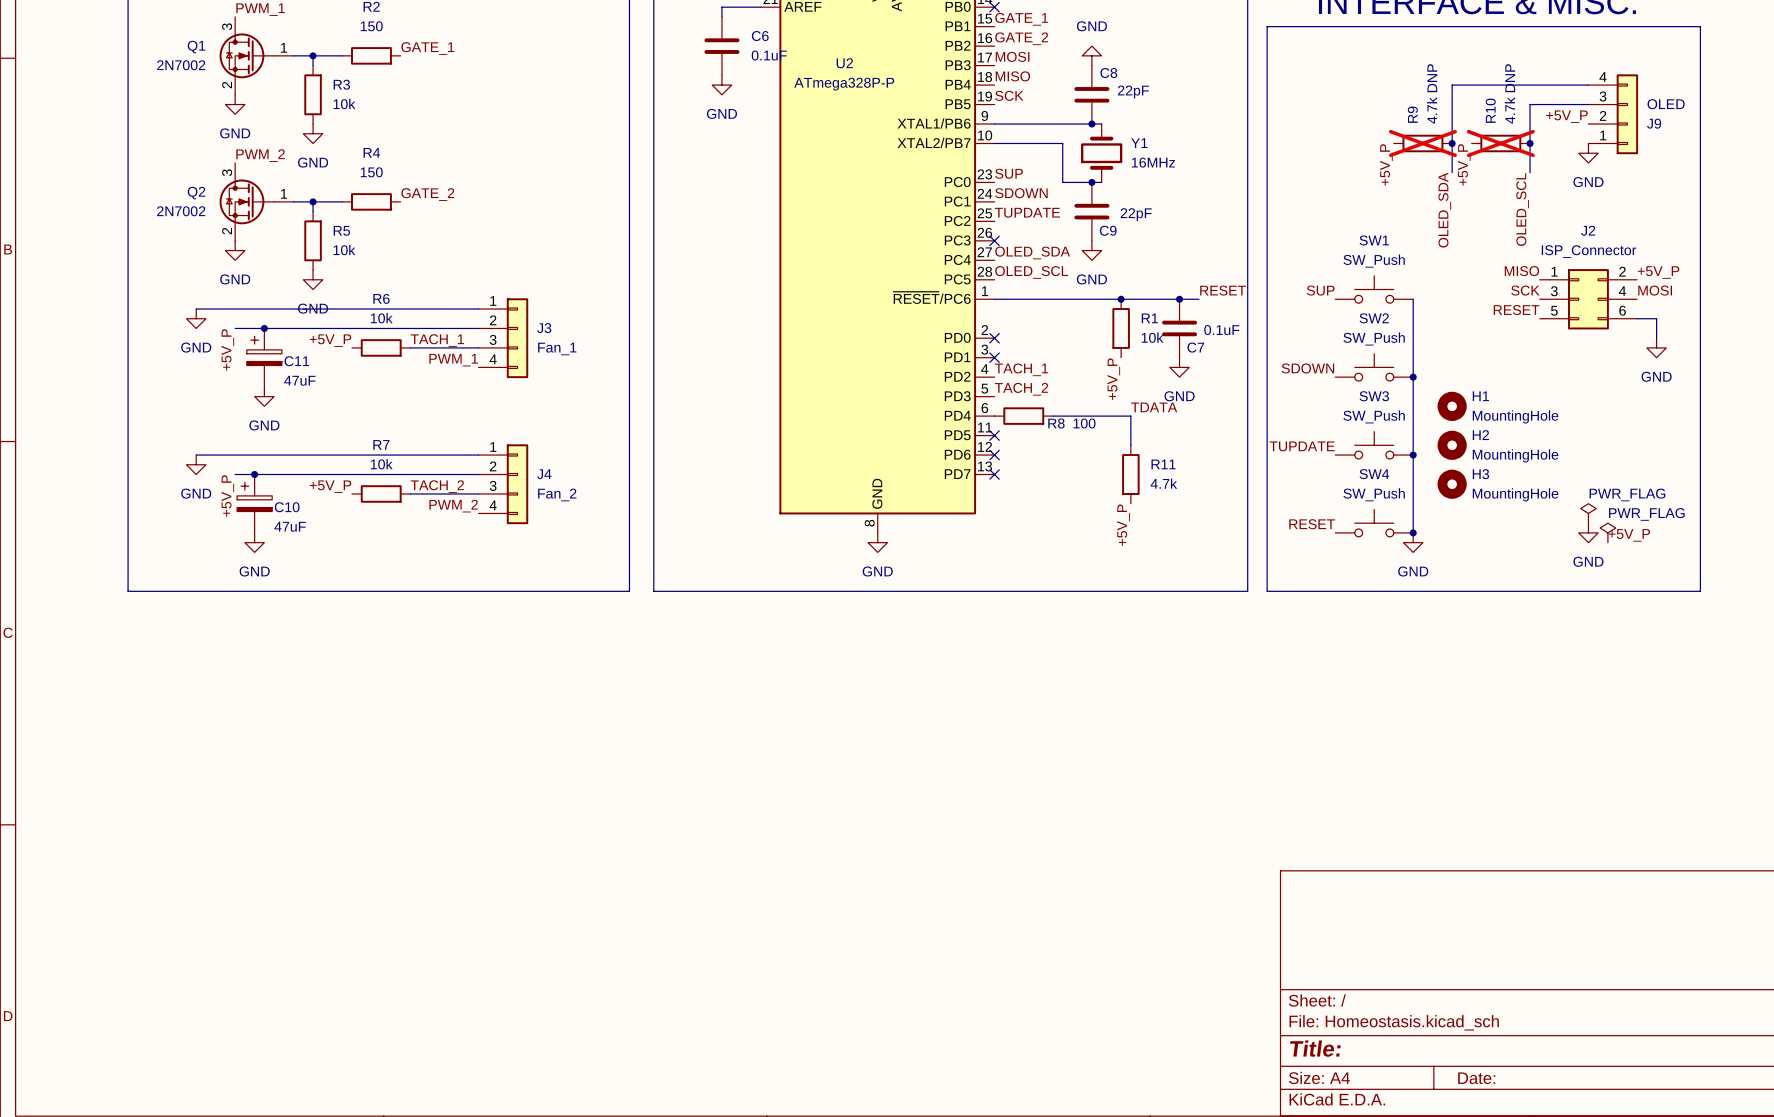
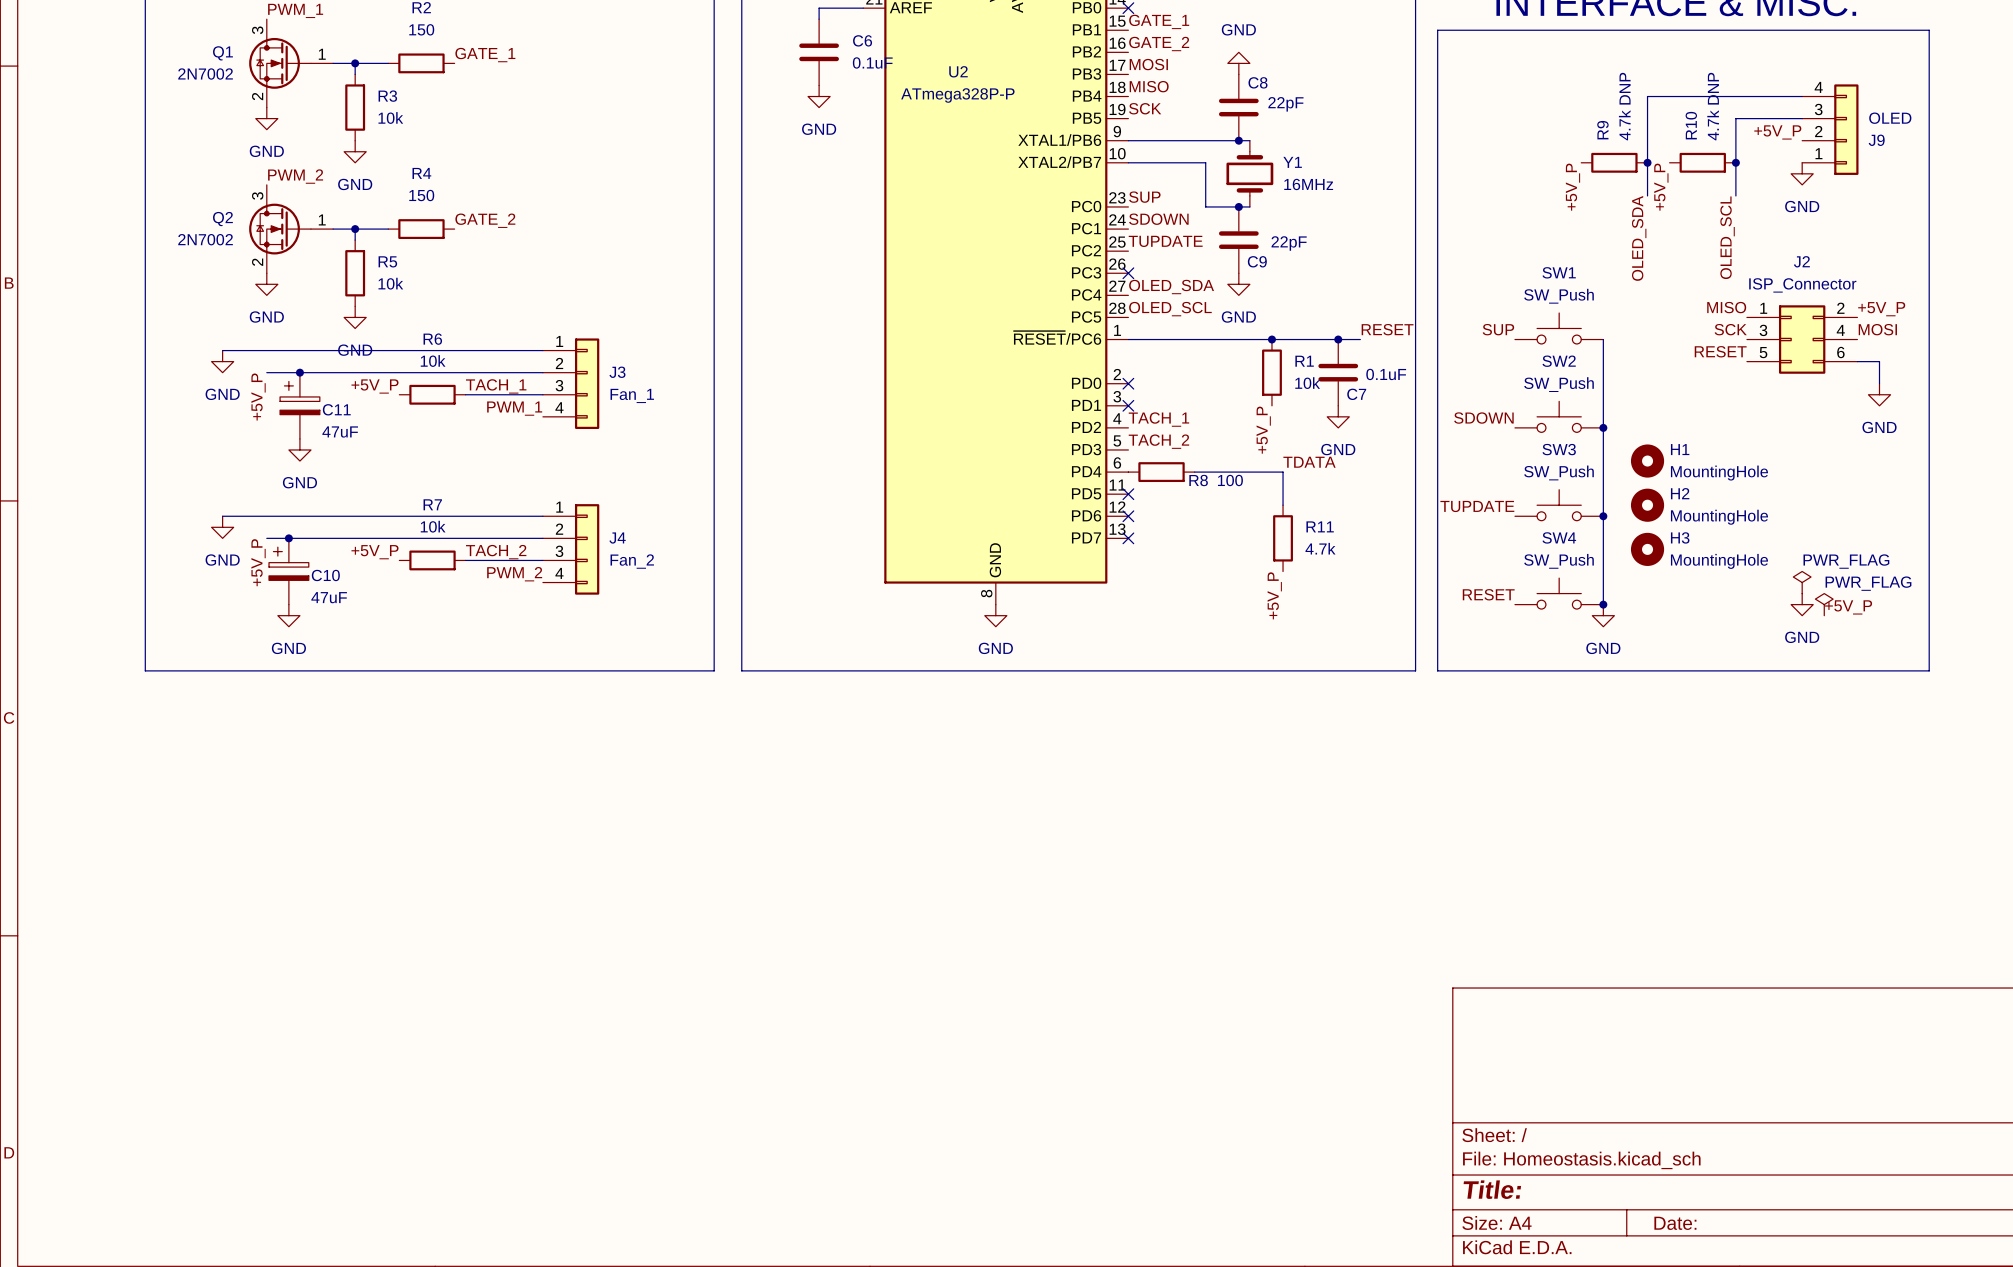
R9 do-not-place cross: (1422, 143) -> none
R10 do-not-place cross: (1500, 143) -> none

